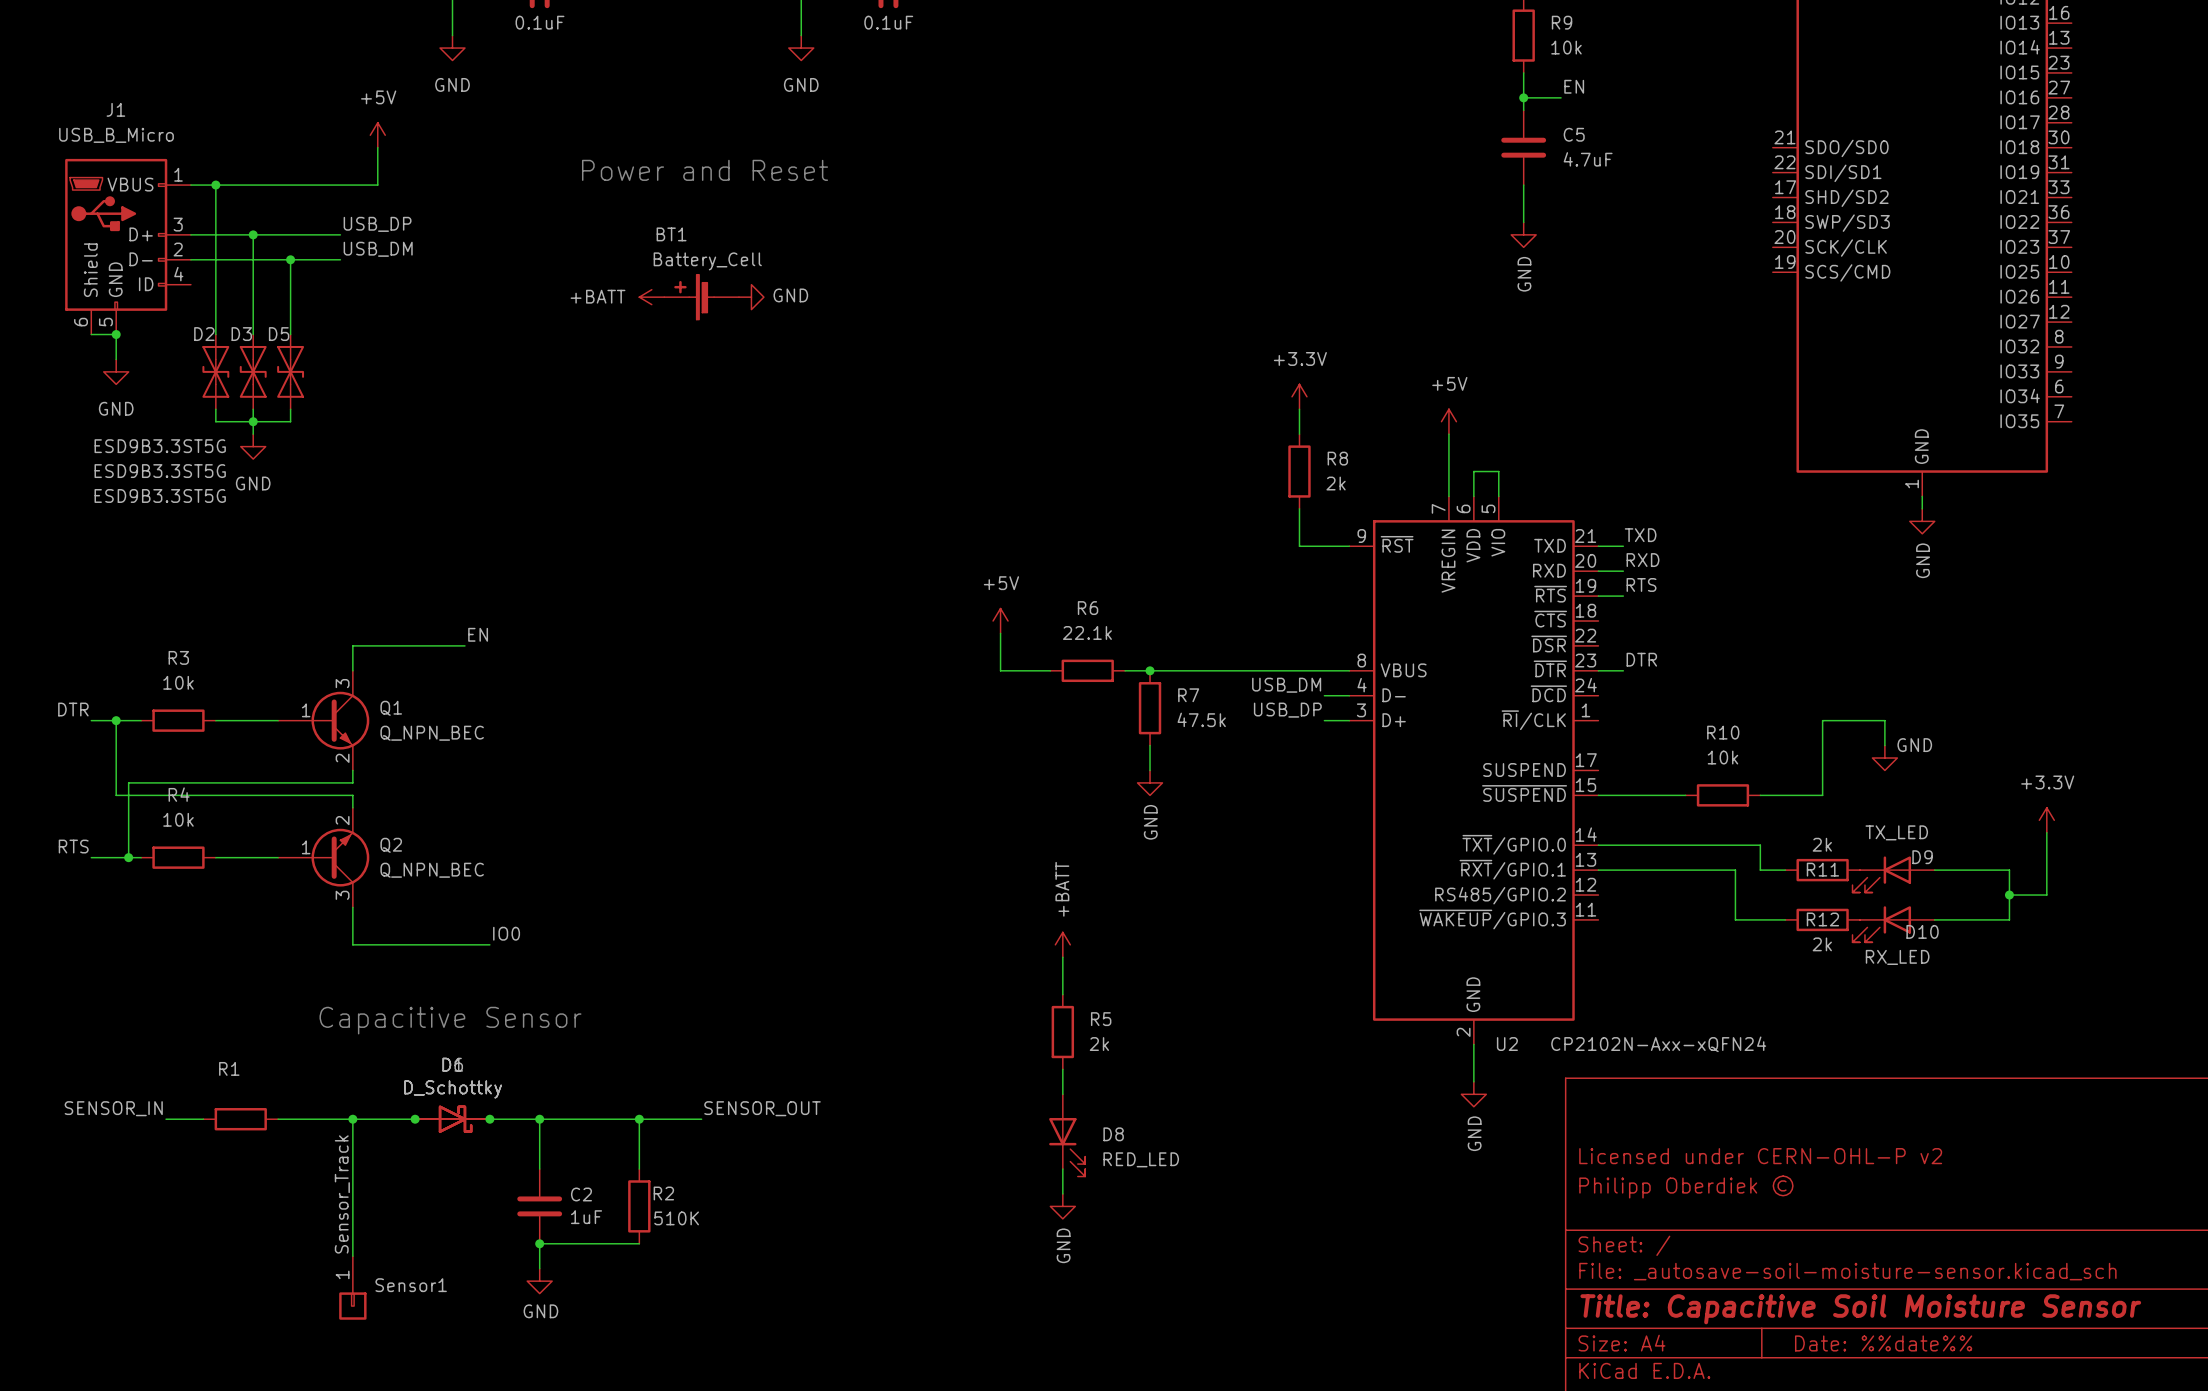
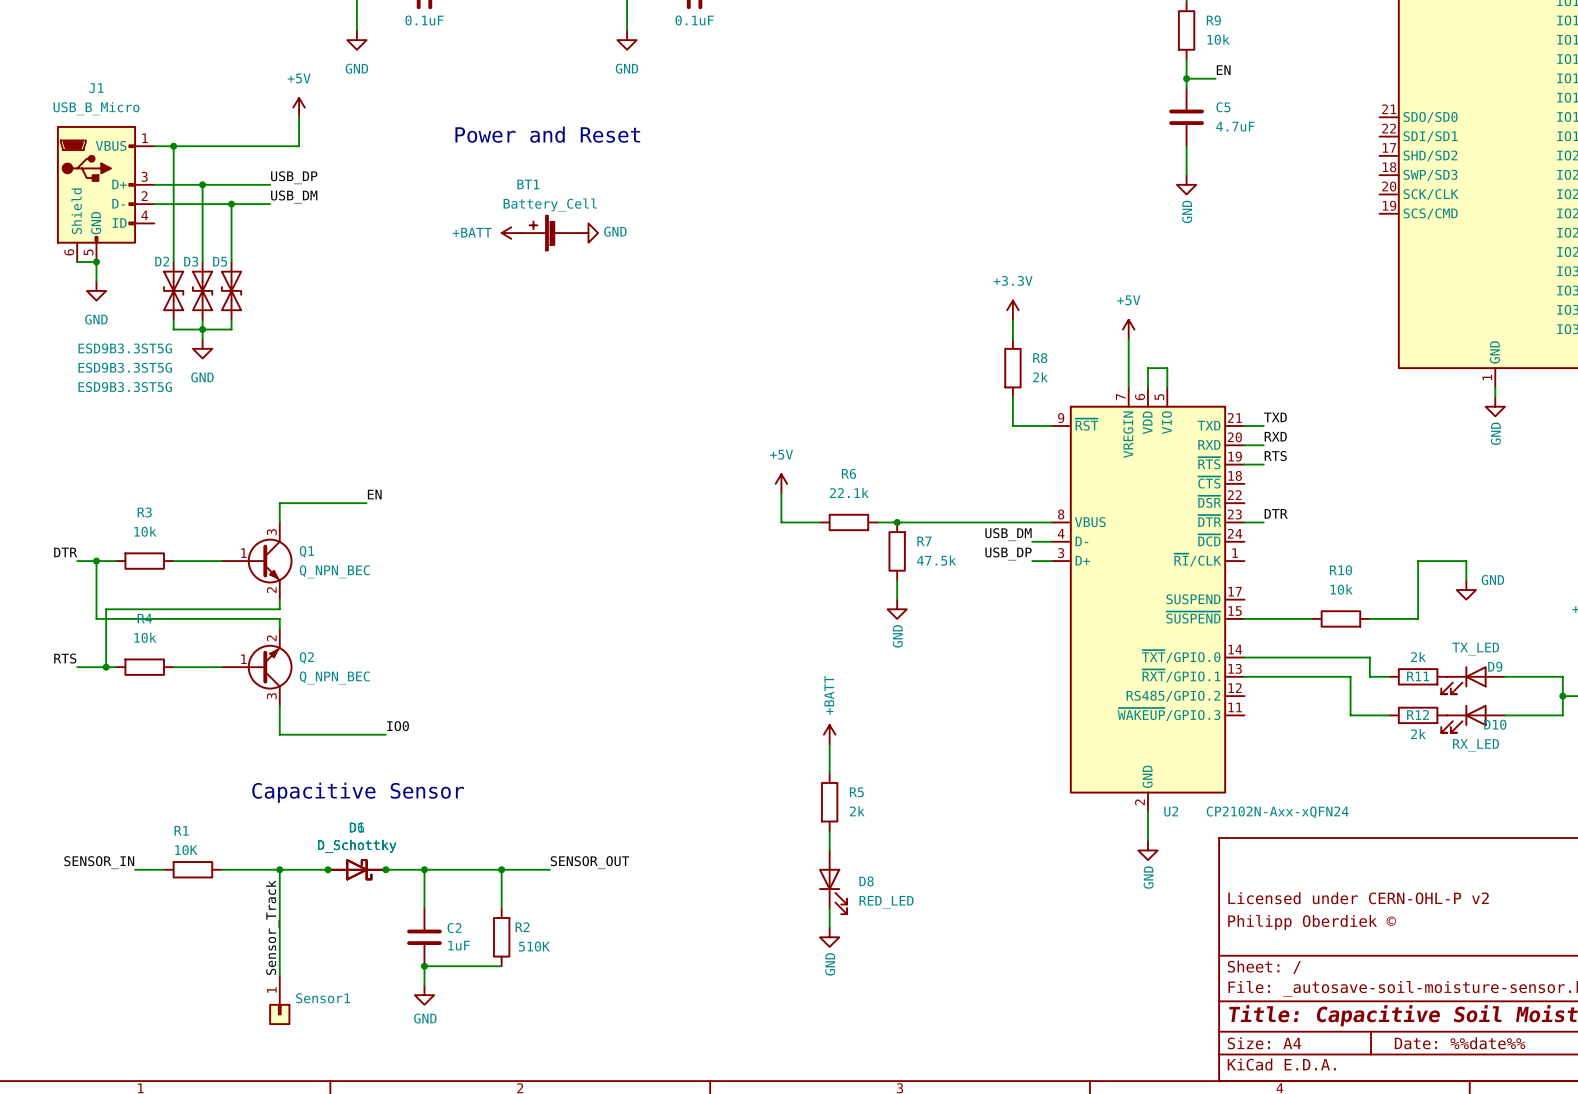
R1 value: none -> 10K (186, 850)

